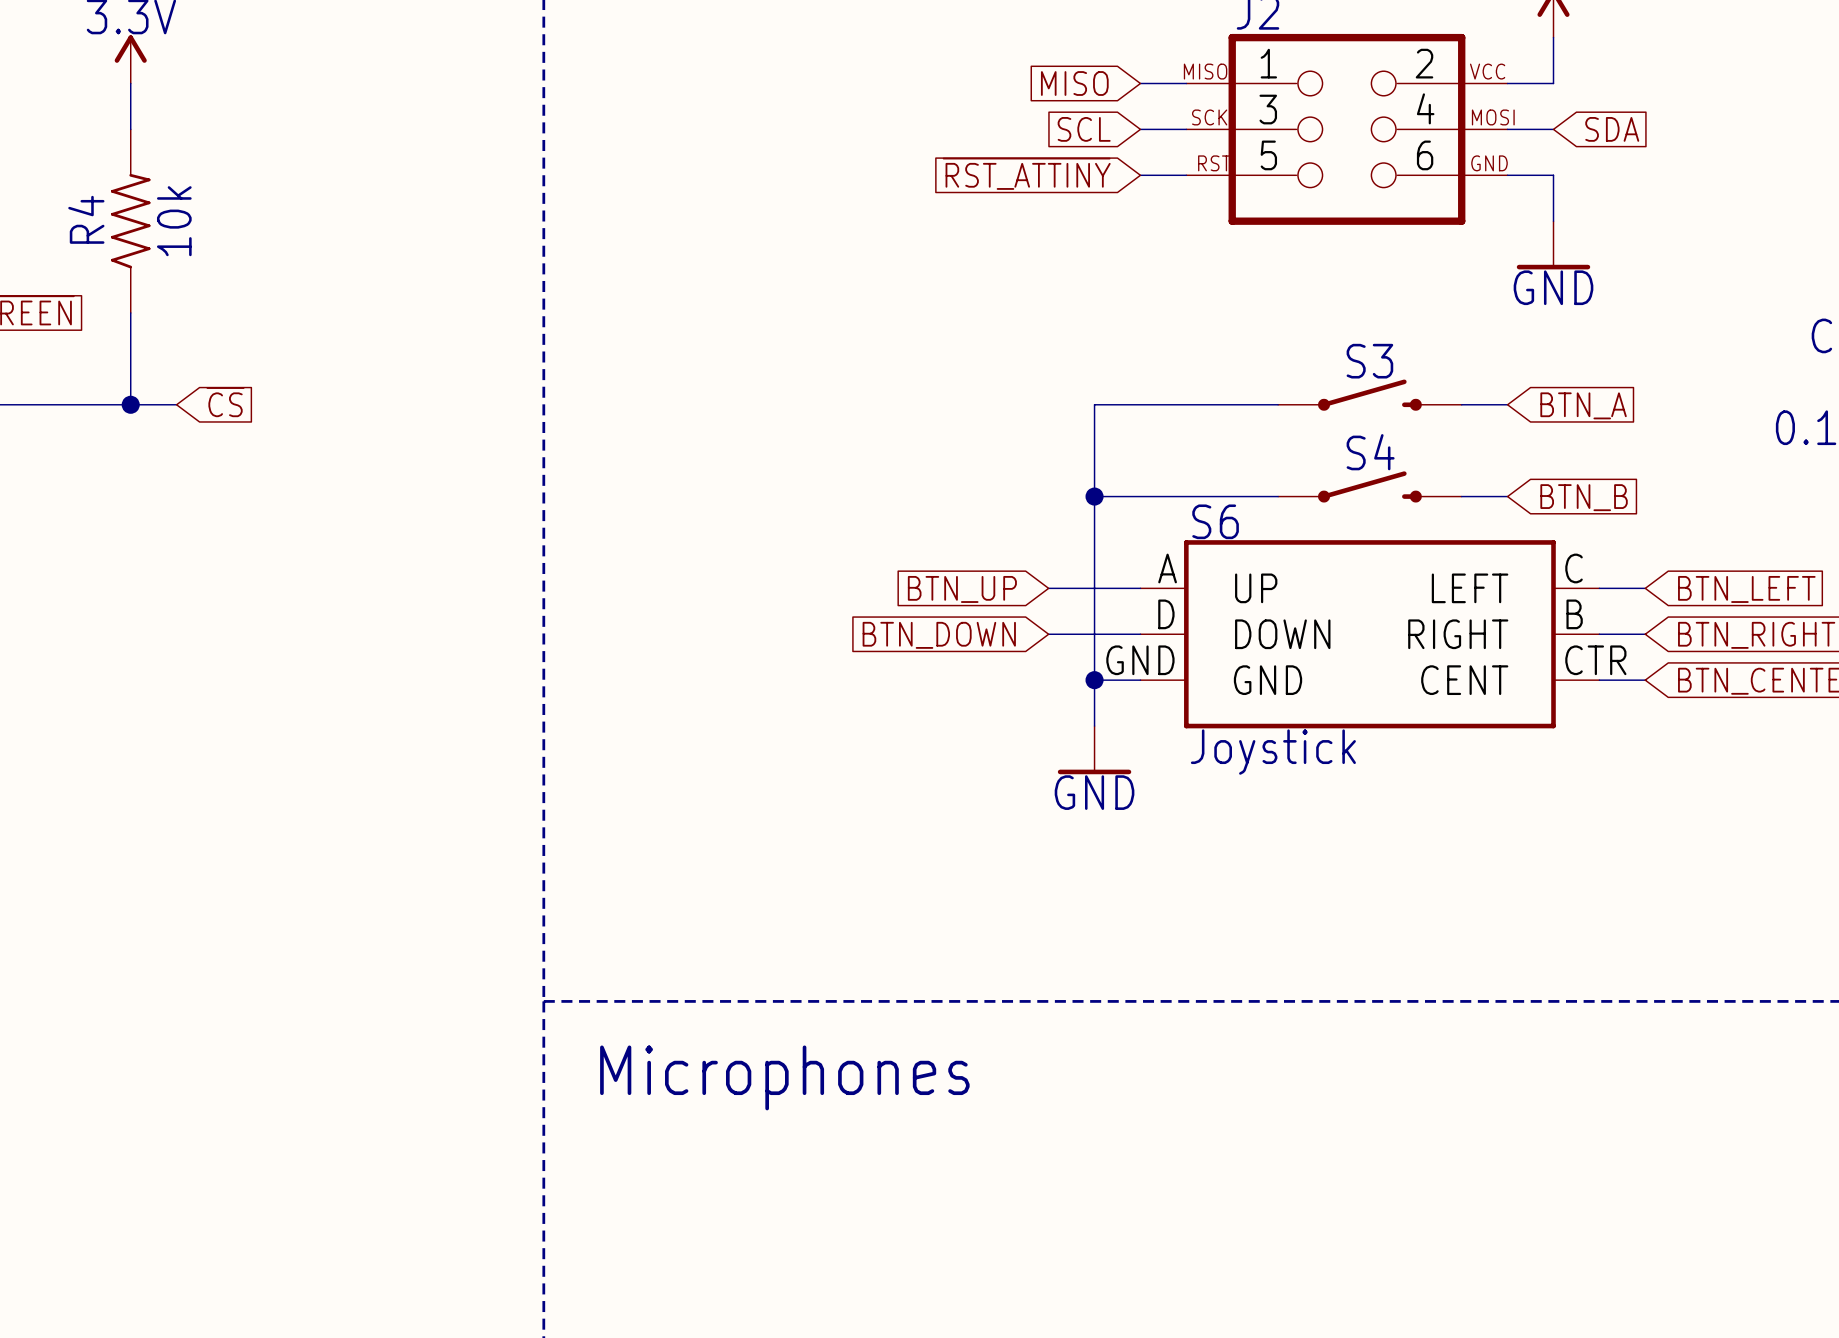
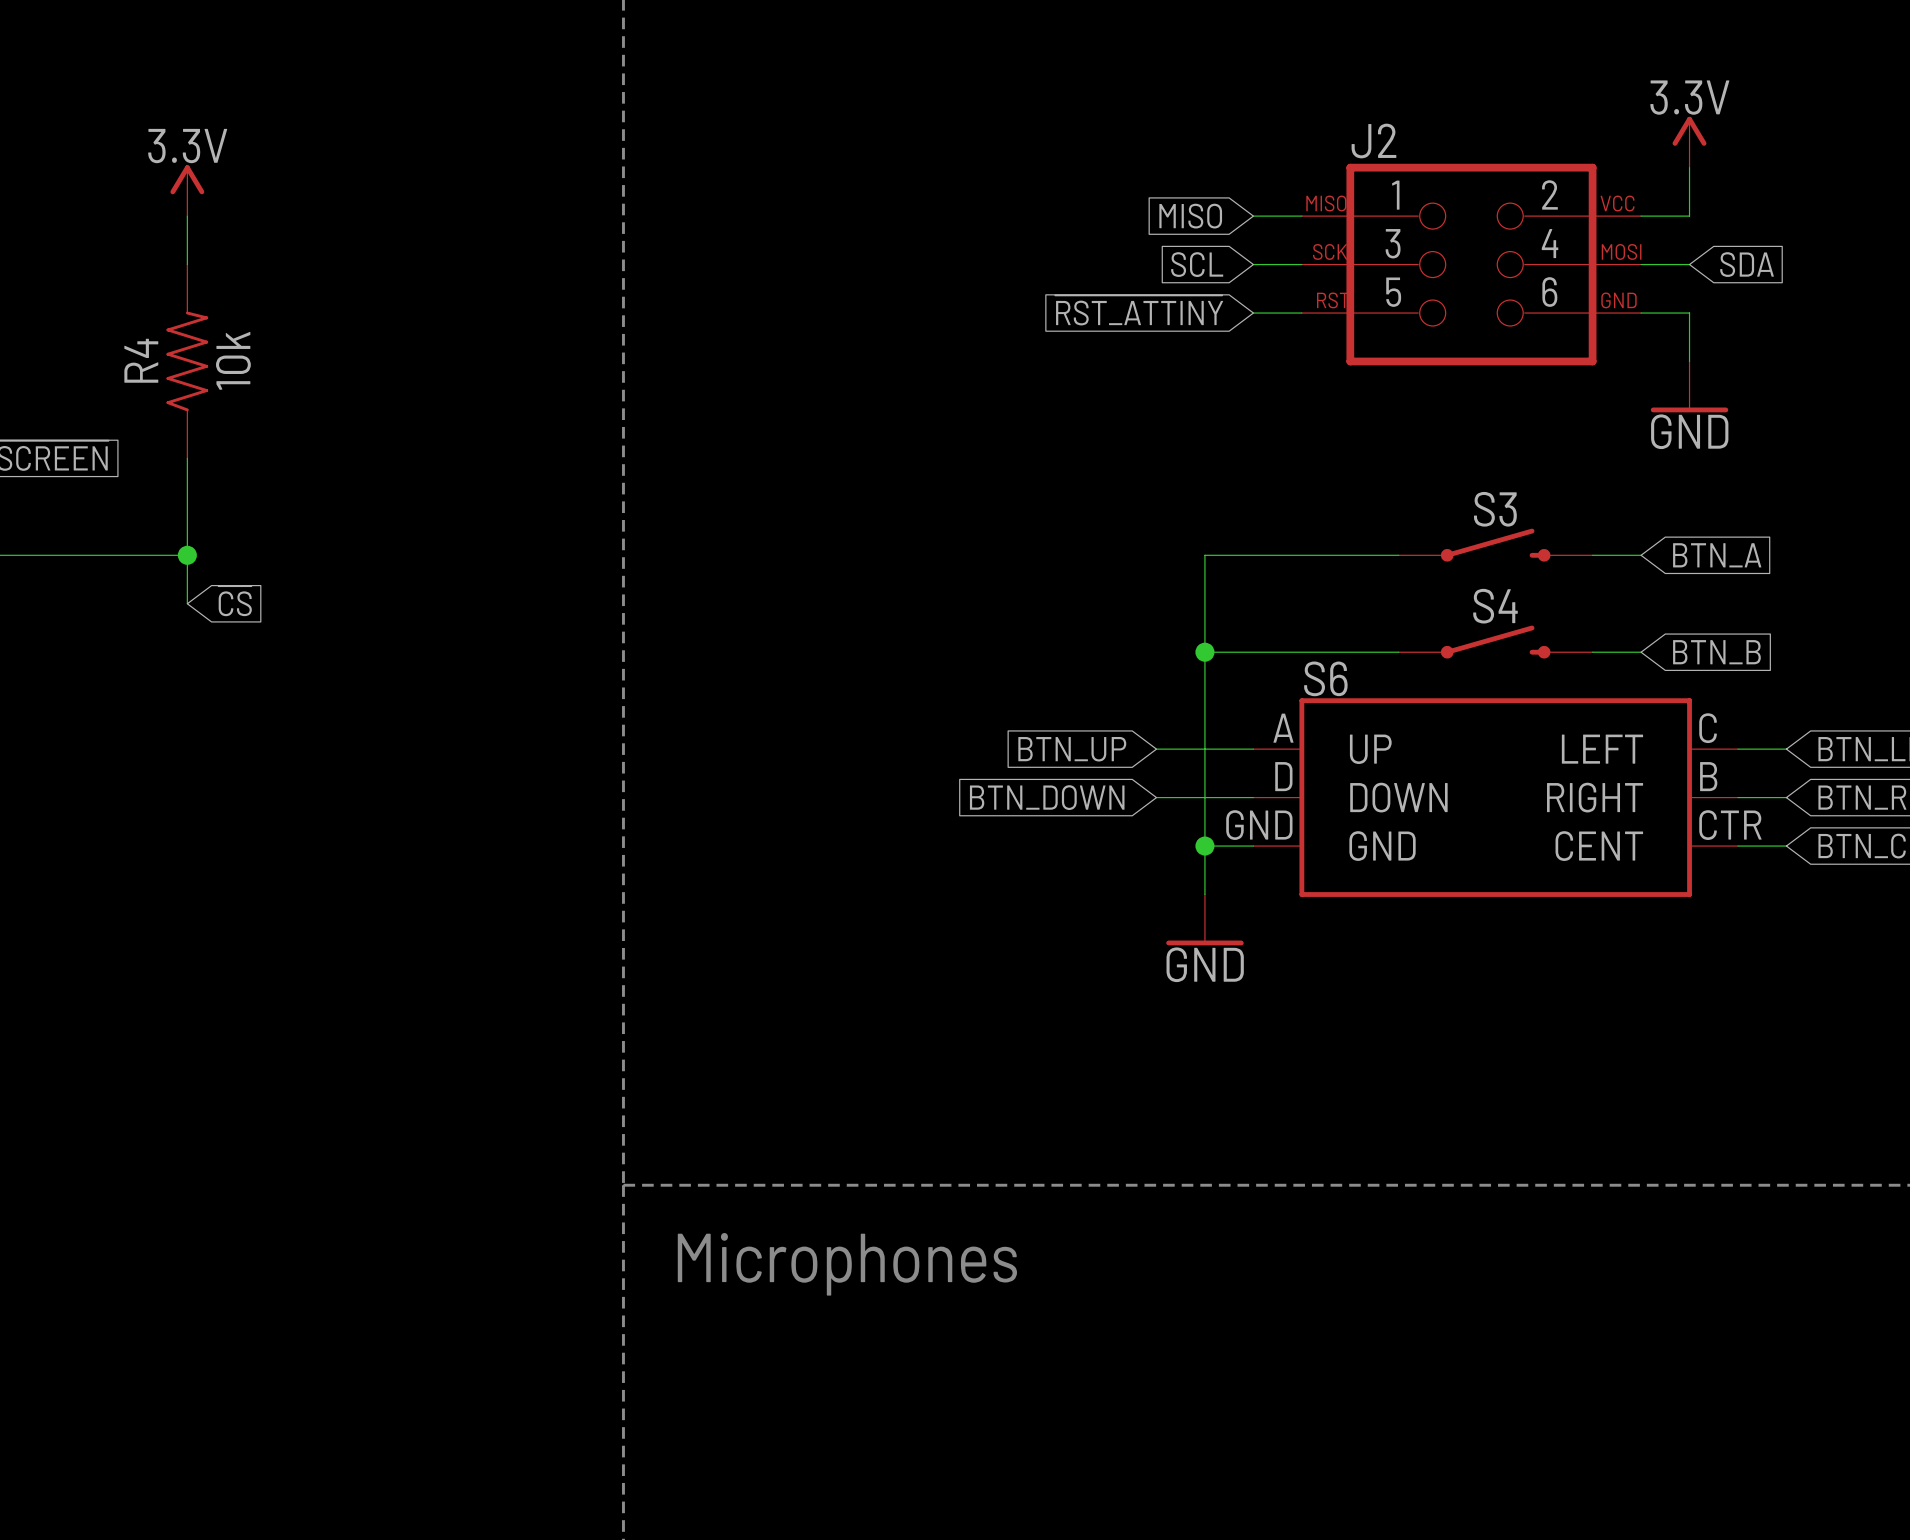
global label position: ~{CS} (225, 402) -> ~{CS} (235, 601)
wire: (130, 404) (176, 404) -> (187, 555) (187, 603)
S6 value: Joystick (1273, 752) -> none

